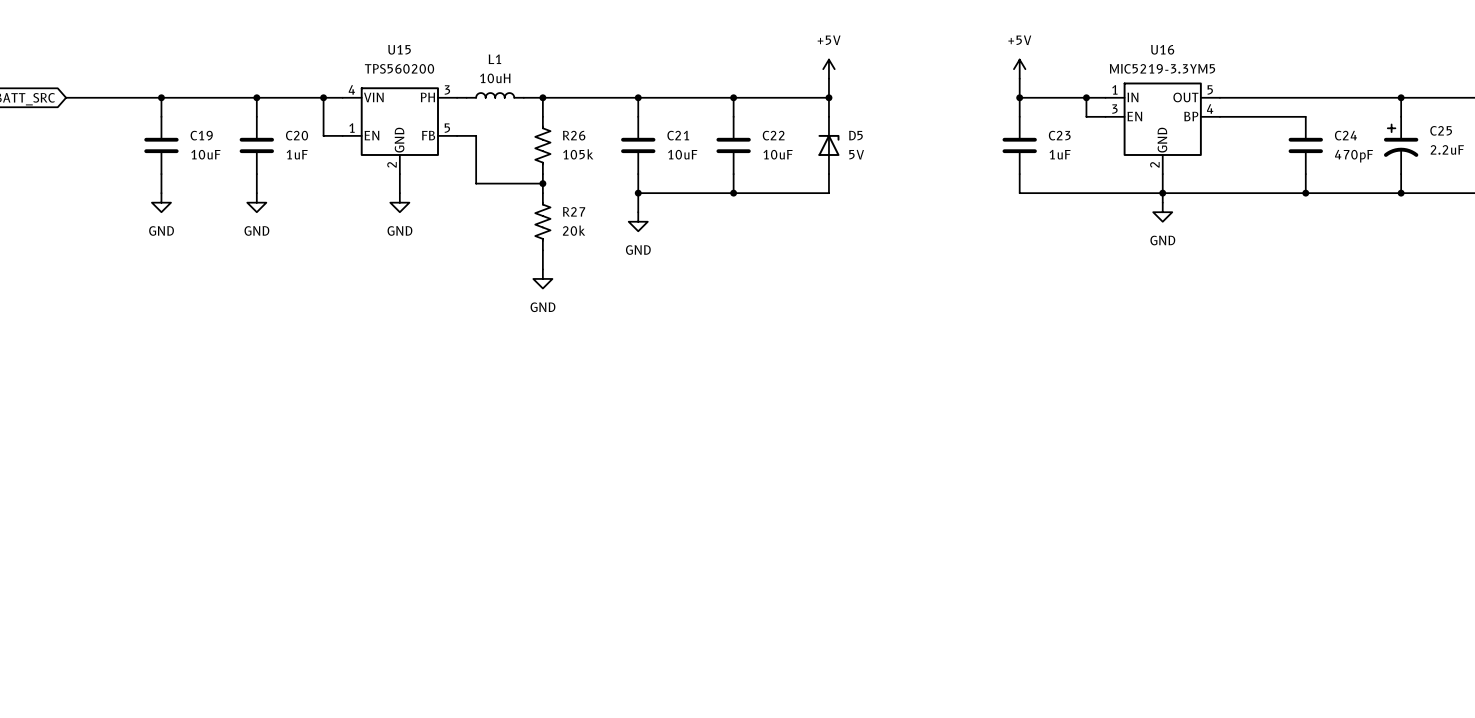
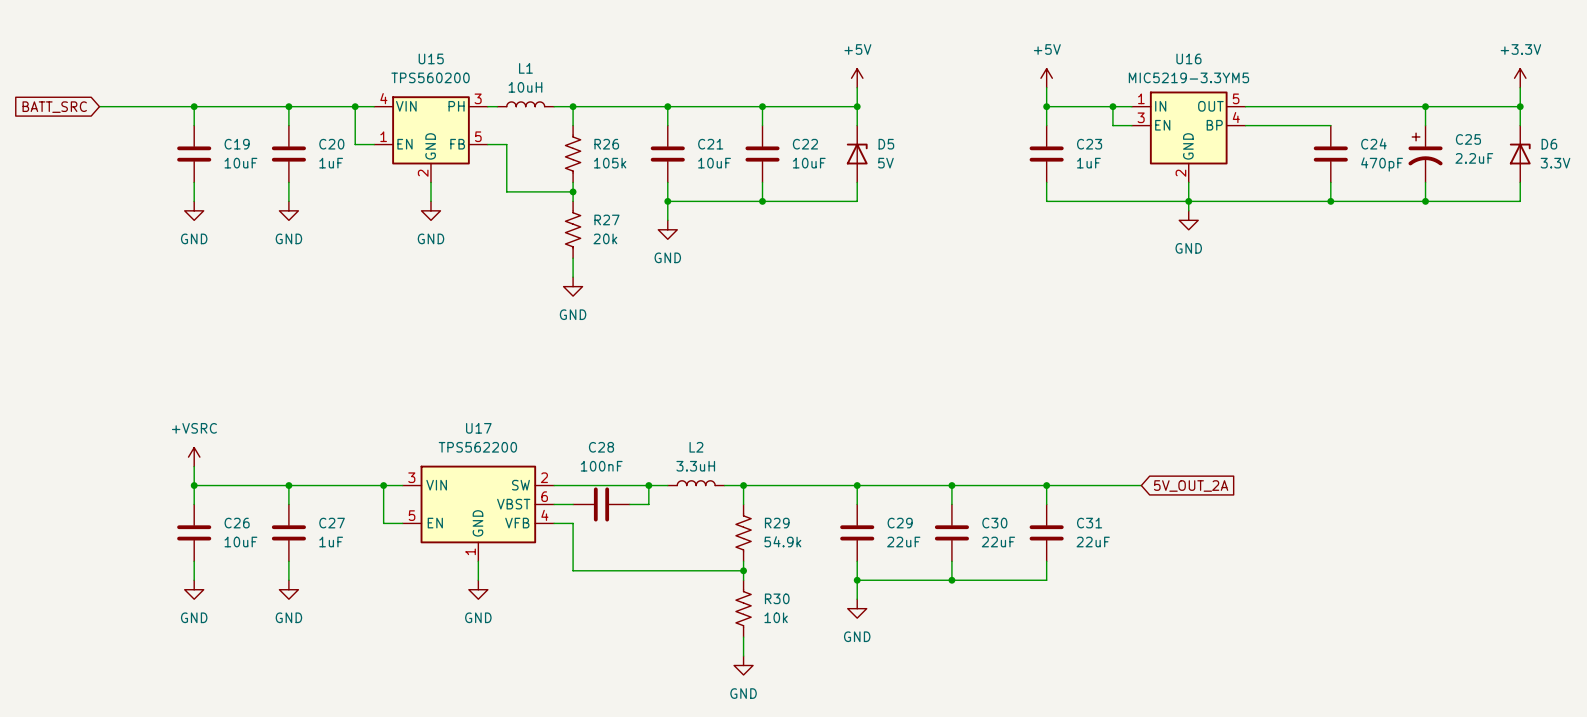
power symbol: none -> +VSRC (194, 457)
wire: none -> (194, 466) (194, 504)
L2: none -> 3.3uH (696, 483)
wire: none -> (194, 485) (402, 485)
junction: none -> (194, 485)
wire: none -> (288, 485) (288, 504)
junction: none -> (288, 485)
wire: none -> (383, 485) (383, 523) (402, 523)
junction: none -> (383, 485)
wire: none -> (554, 485) (667, 485)
wire: none -> (648, 485) (648, 504) (629, 504)
junction: none -> (648, 485)
wire: none -> (724, 485) (1141, 485)
wire: none -> (743, 485) (743, 504)
junction: none -> (743, 485)
wire: none -> (857, 485) (857, 504)
junction: none -> (857, 485)
wire: none -> (951, 485) (951, 504)
junction: none -> (951, 485)
wire: none -> (1046, 485) (1046, 504)
junction: none -> (1046, 485)
global label: none -> 5V_OUT_2A (1191, 485)
wire: none -> (554, 504) (573, 504)
C28: none -> 100nF (601, 504)
U17: none -> TPS562200 (478, 513)
wire: none -> (554, 523) (573, 523) (573, 570) (743, 570)
C26: none -> 10uF (194, 532)
C27: none -> 1uF (288, 532)
R29: none -> 54.9k (743, 532)
C29: none -> 22uF (857, 532)
C30: none -> 22uF (951, 532)
C31: none -> 22uF (1046, 532)
wire: none -> (194, 561) (194, 580)
wire: none -> (288, 561) (288, 580)
wire: none -> (478, 561) (478, 580)
wire: none -> (743, 561) (743, 580)
wire: none -> (857, 561) (857, 599)
wire: none -> (951, 561) (951, 580)
wire: none -> (1046, 561) (1046, 580) (857, 580)
junction: none -> (743, 570)
junction: none -> (857, 580)
junction: none -> (951, 580)
power symbol: none -> GND (194, 589)
power symbol: none -> GND (288, 589)
power symbol: none -> GND (478, 589)
R30: none -> 10k (743, 608)
power symbol: none -> GND (857, 608)
wire: none -> (743, 637) (743, 656)
power symbol: none -> GND (743, 665)

